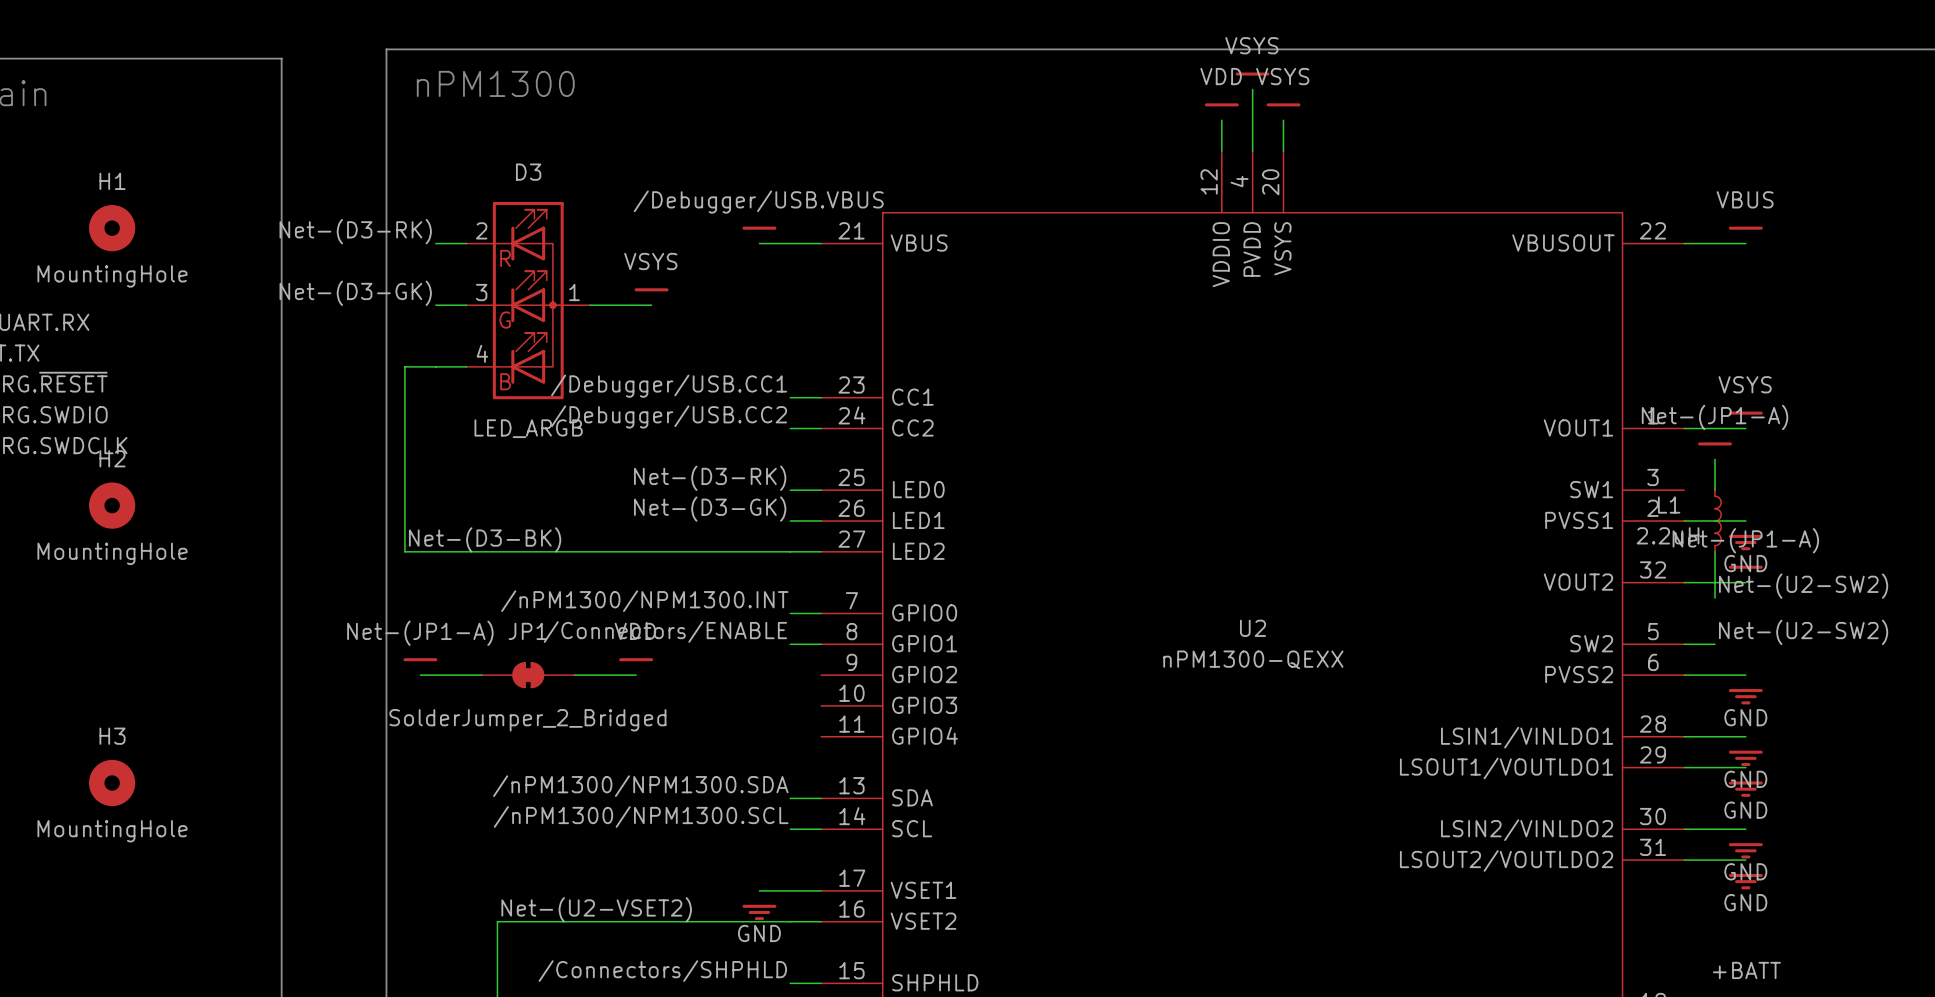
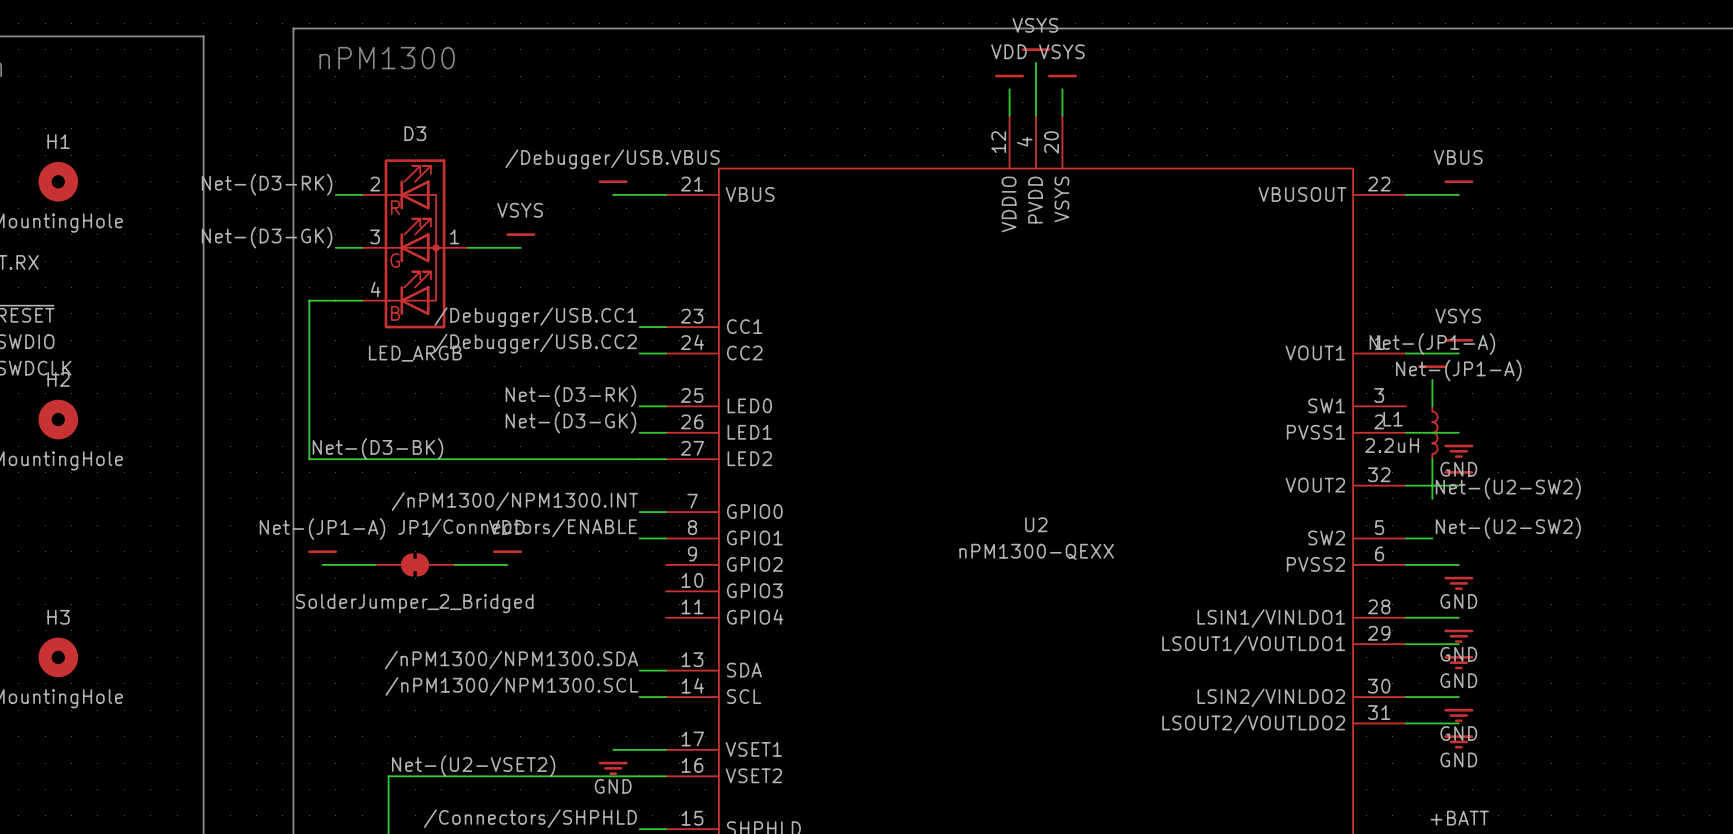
power symbol text position: Net-(JP1-A) (1745, 540) -> Net-(JP1-A) (1458, 370)

